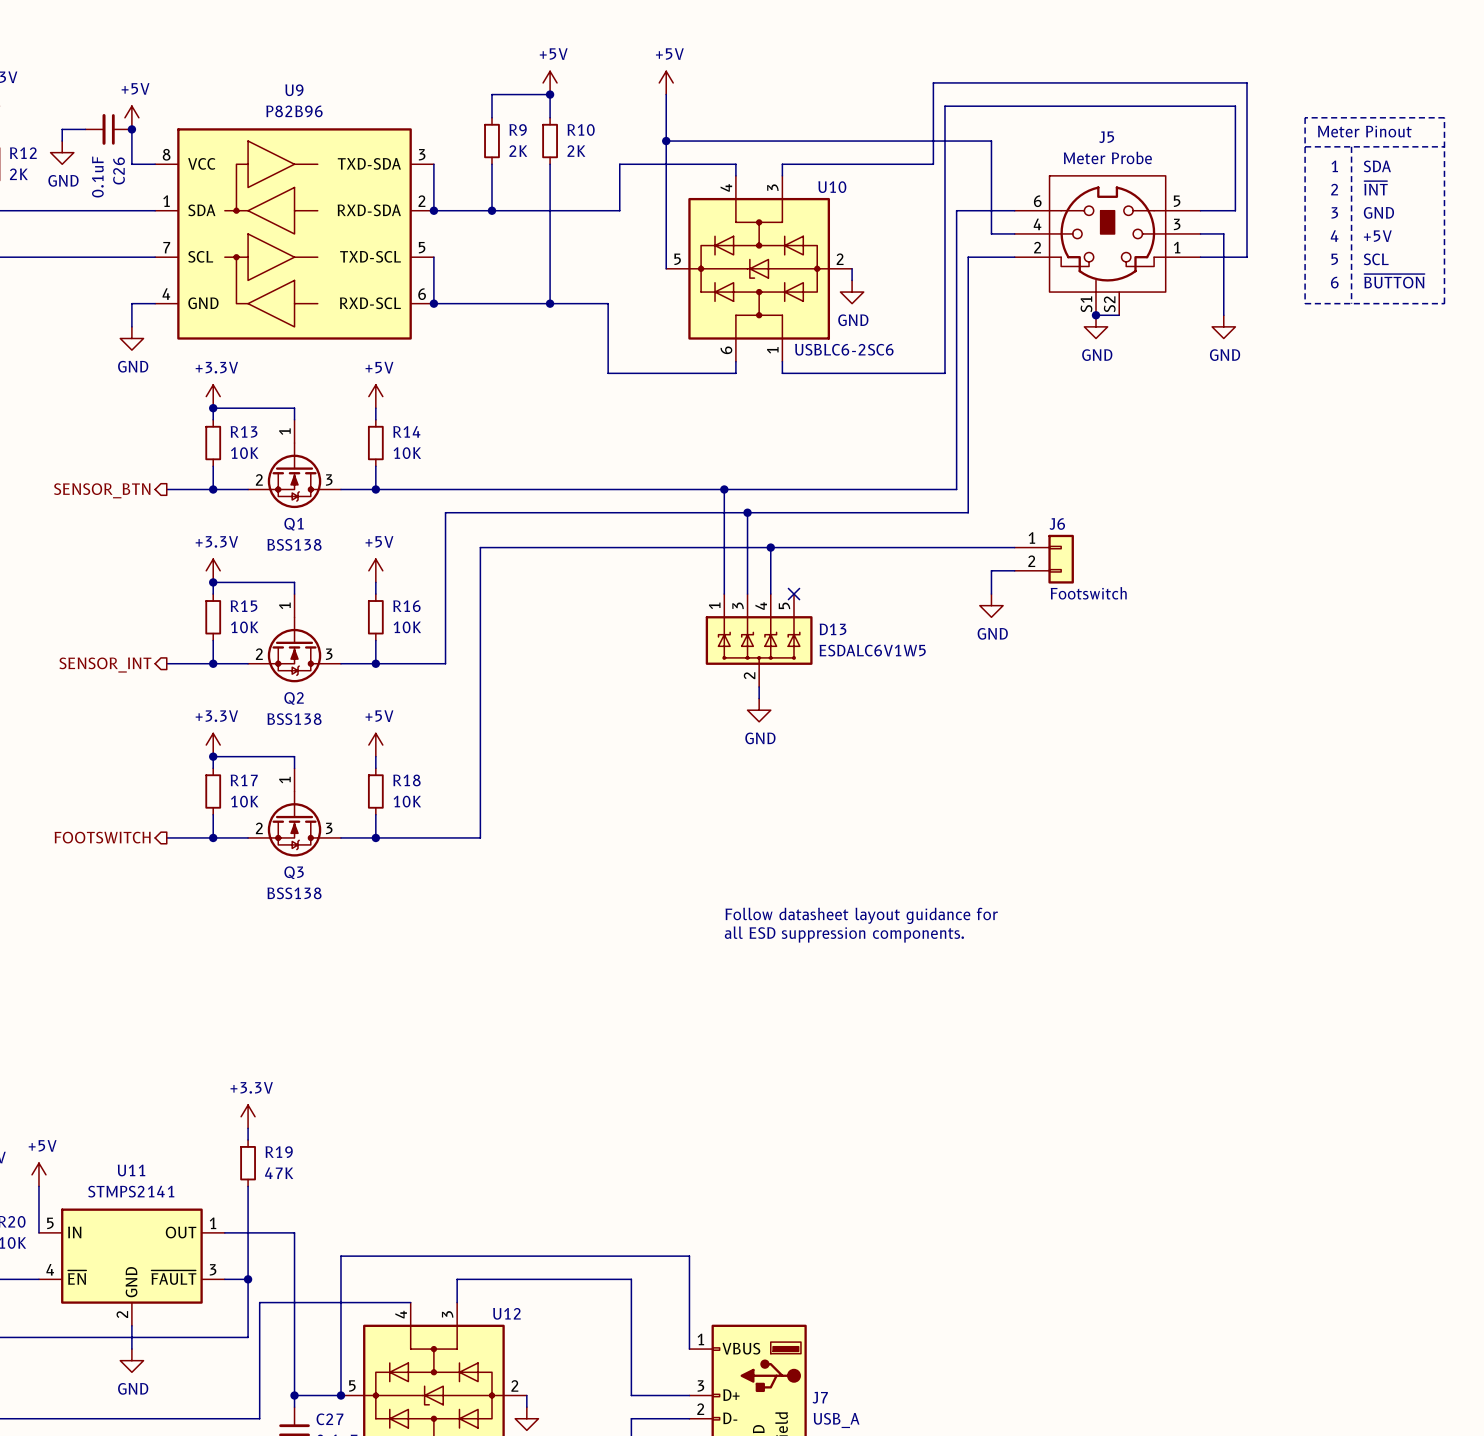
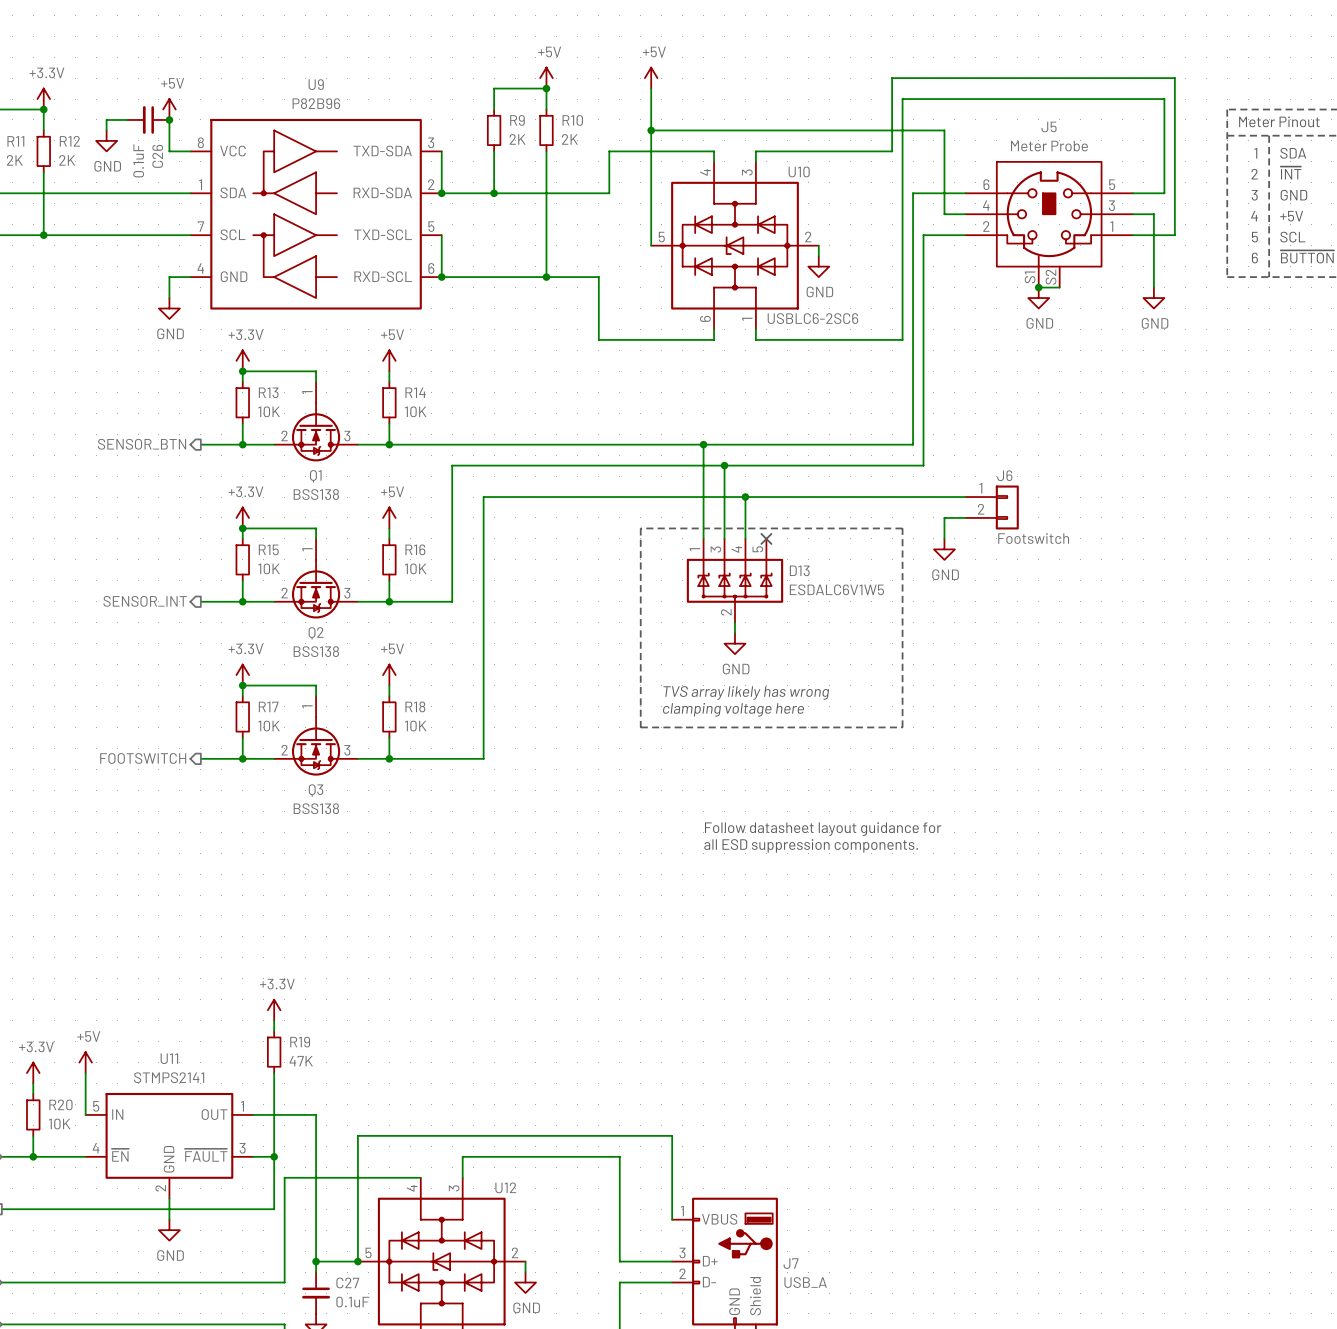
line: none -> (640, 528) (640, 727) (902, 727) (902, 528) (640, 528)
text: none -> TVS array likely has wrong (746, 692)
text: none -> clamping voltage here (733, 709)

